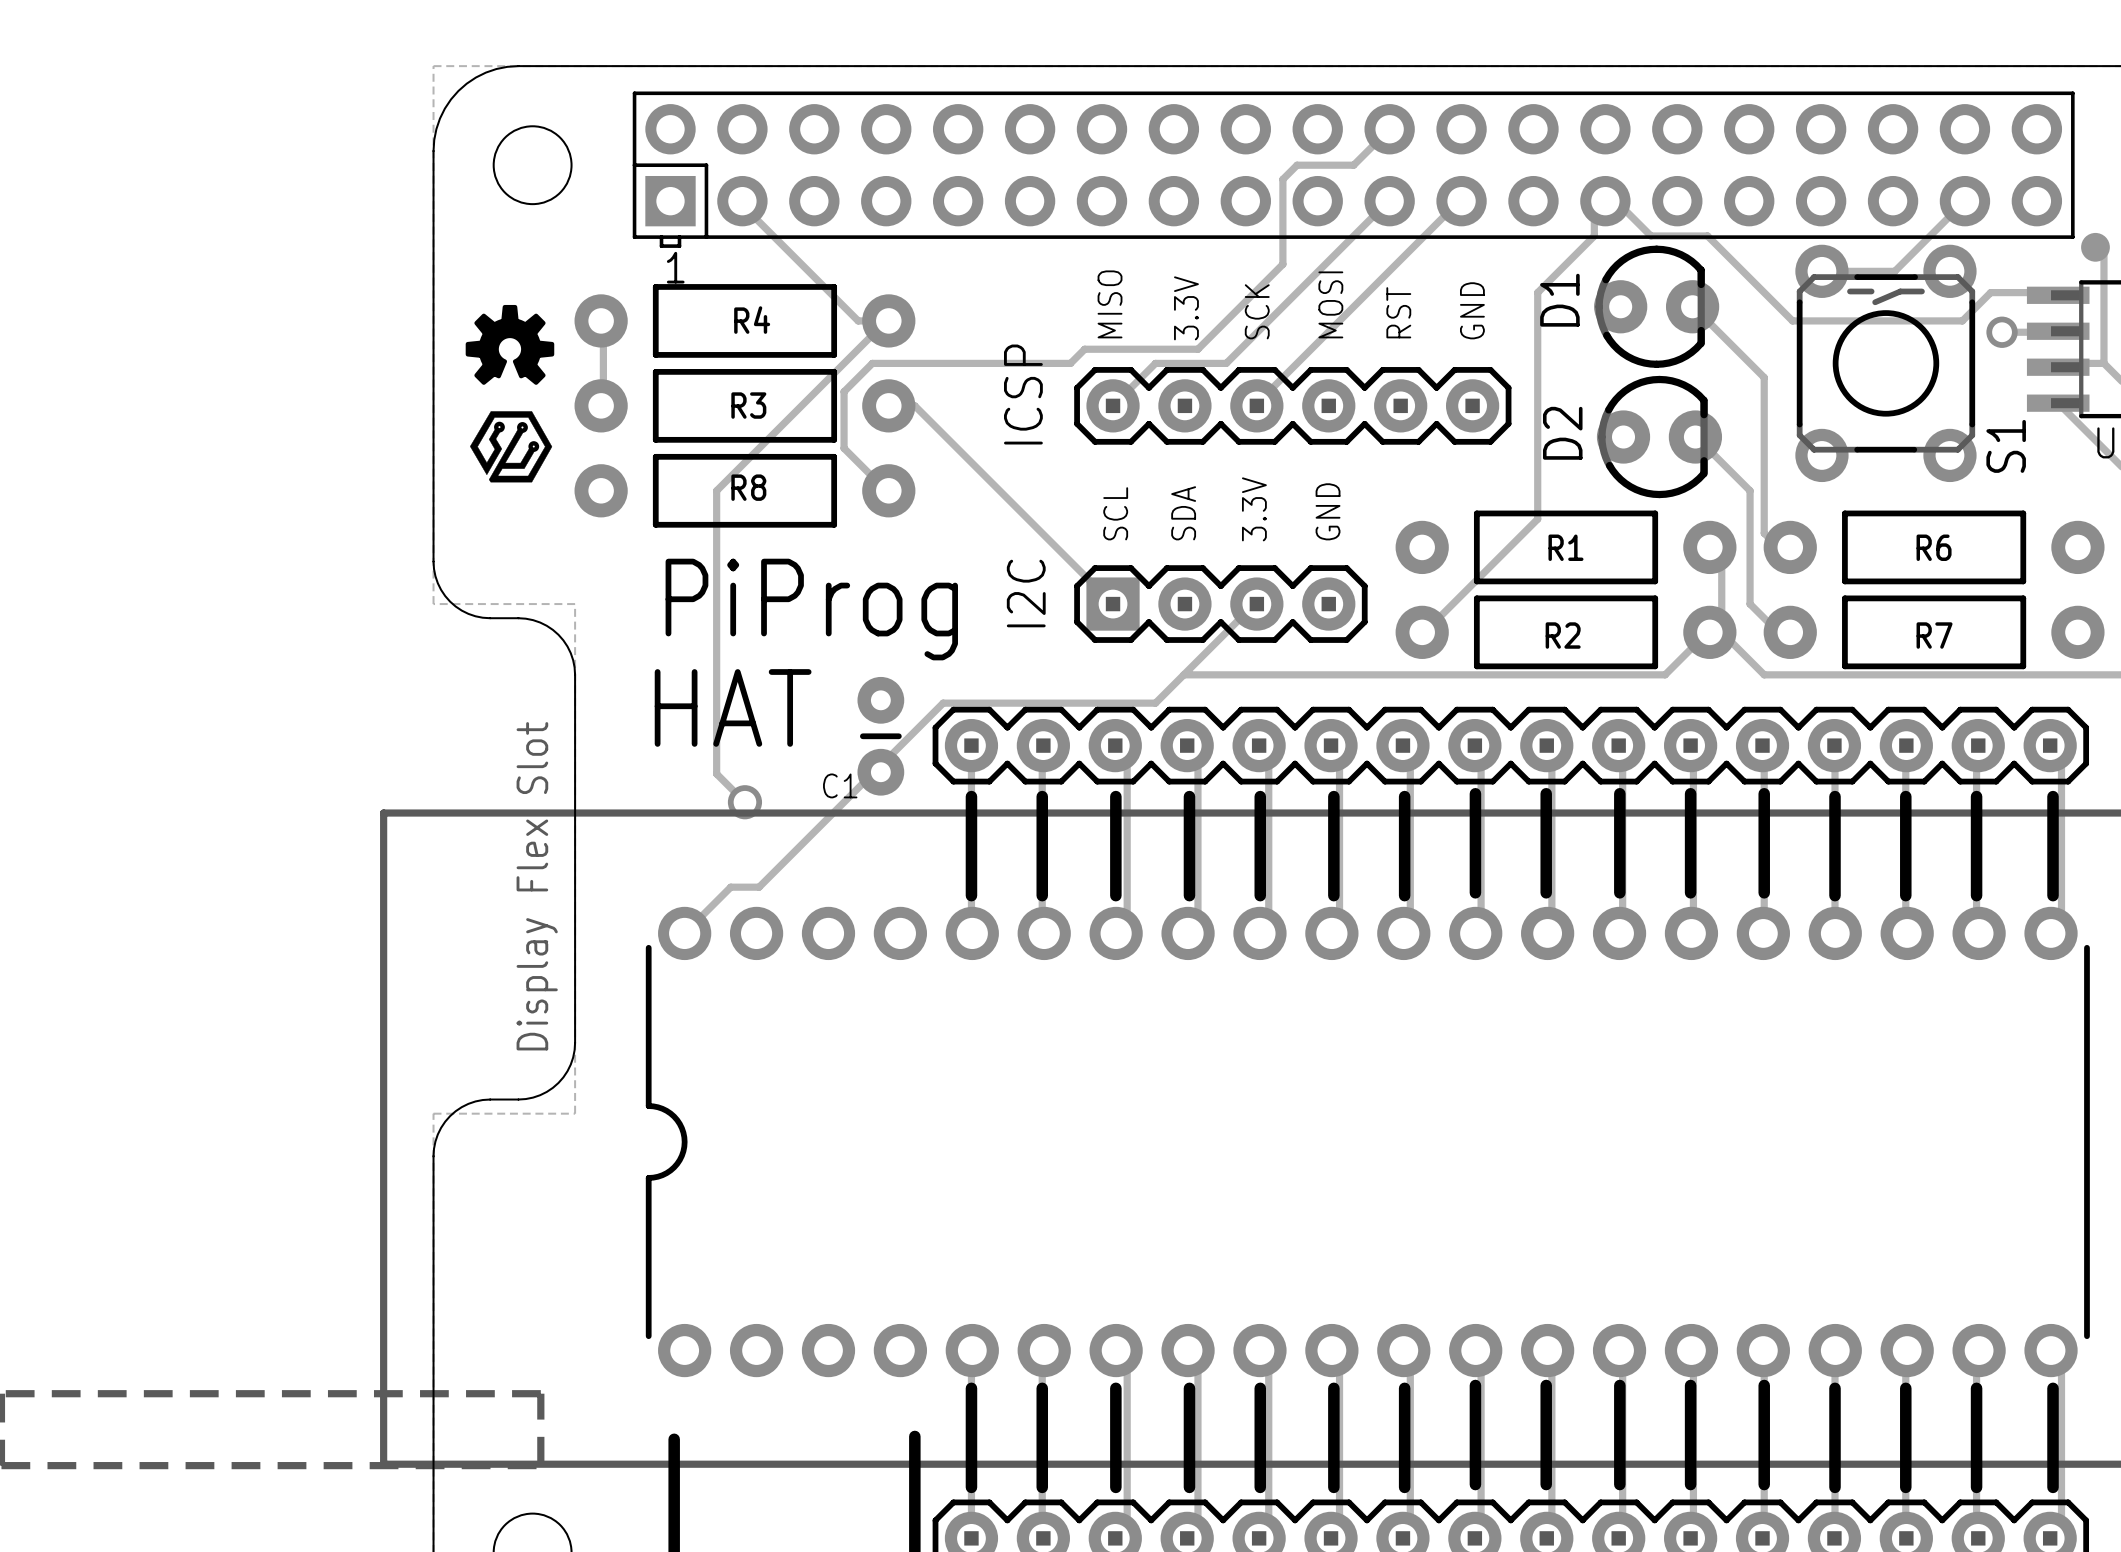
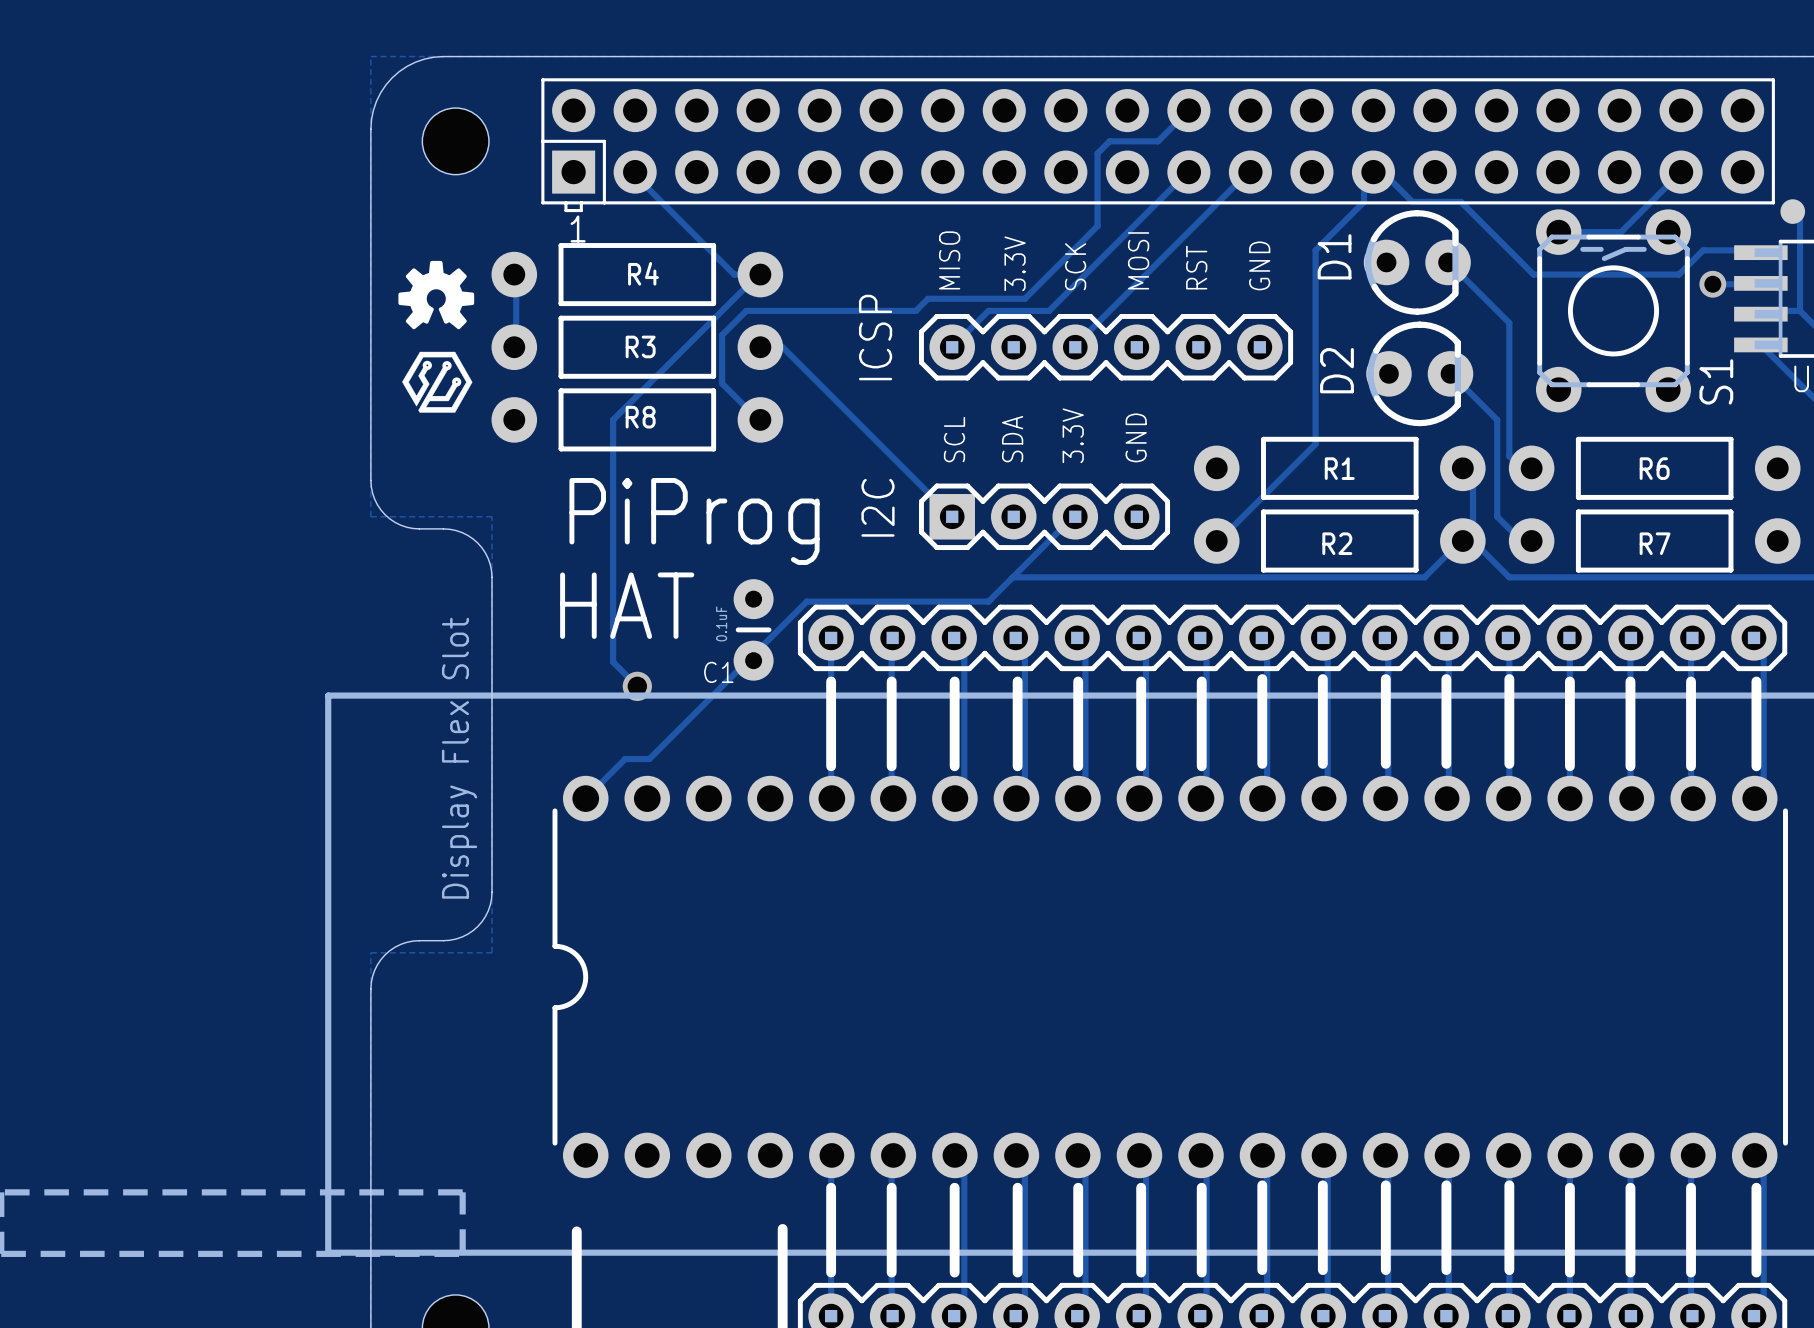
C1 value: none -> 0.1uF (721, 623)

